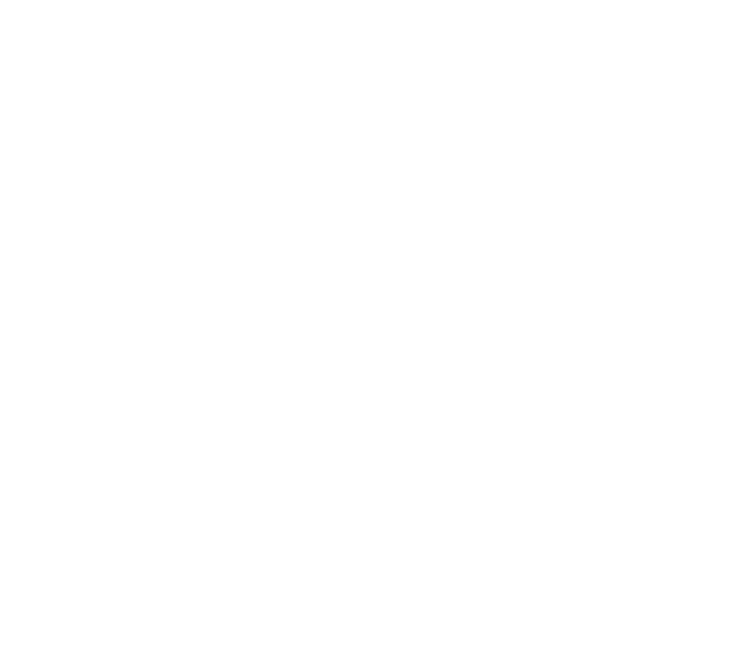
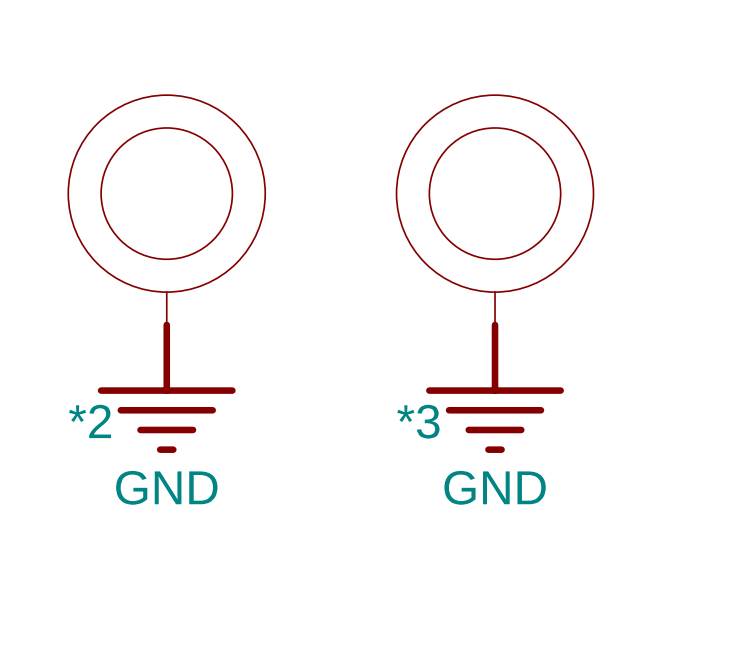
*2: none -> (166, 210)
*3: none -> (495, 210)
power symbol: none -> GND (166, 387)
power symbol: none -> GND (495, 387)

